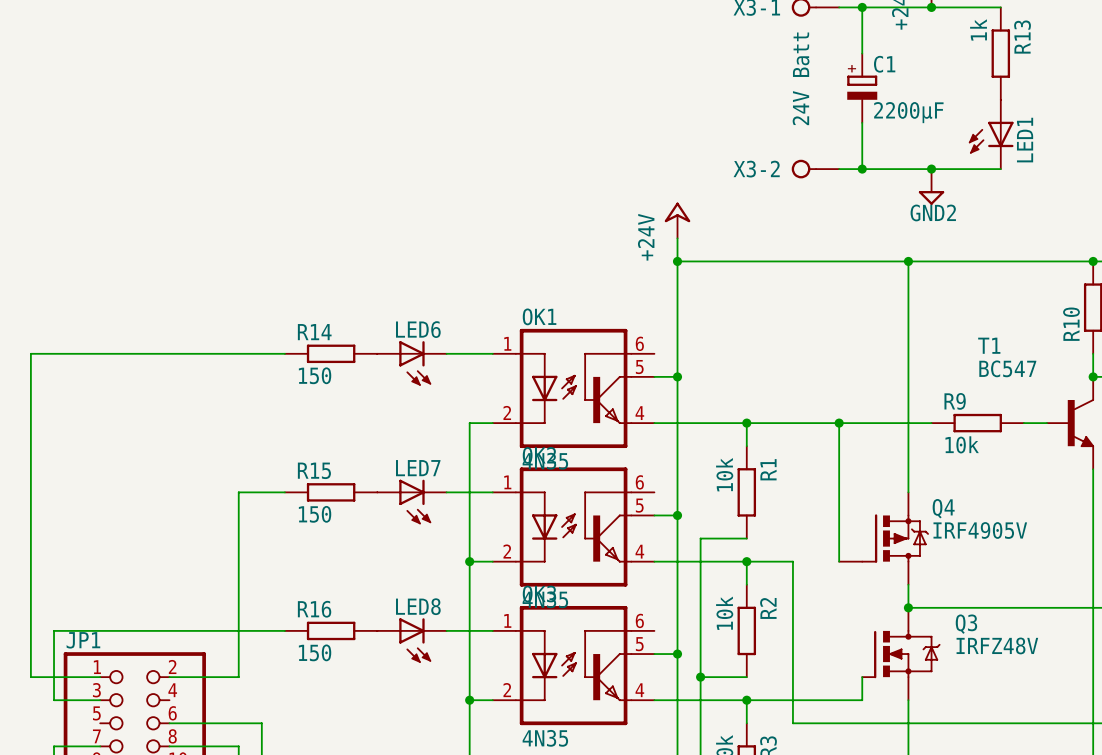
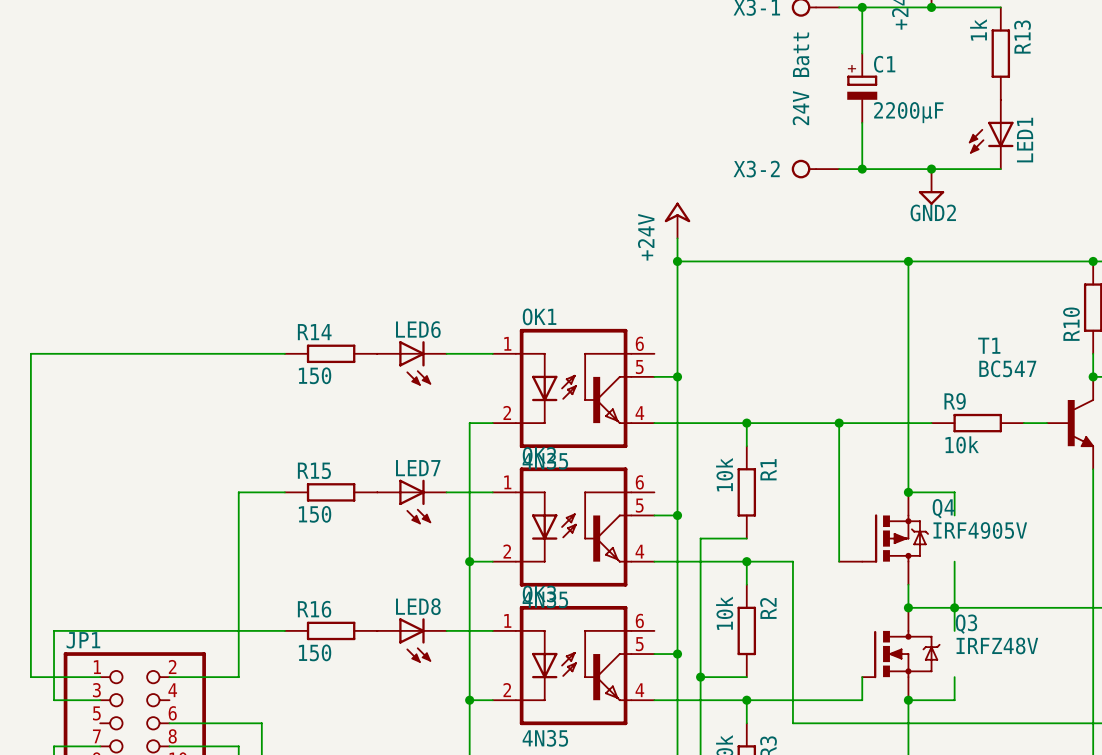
wire: none -> (908, 492) (954, 492) (954, 515)
junction: none -> (908, 492)
wire: none -> (954, 561) (954, 630)
junction: none -> (954, 607)
wire: none -> (954, 677) (954, 700) (908, 700)
junction: none -> (908, 700)

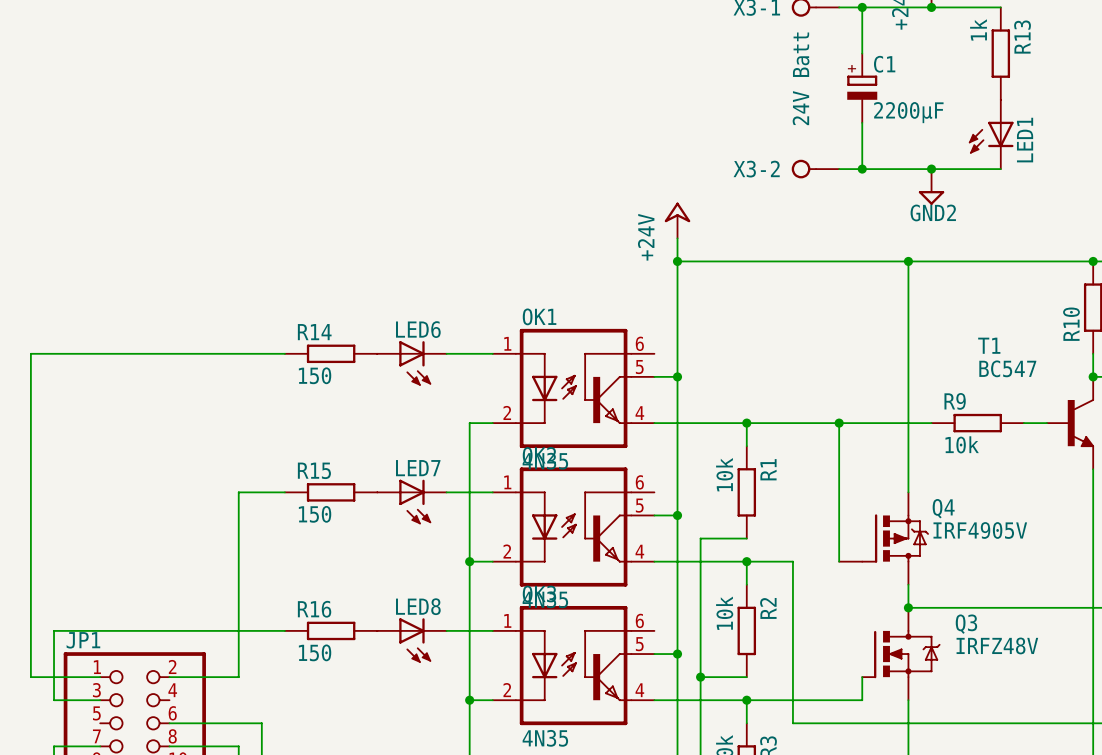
wire: (908, 492) (954, 492) (954, 515) -> none
junction: (908, 492) -> none
wire: (954, 561) (954, 630) -> none
junction: (954, 607) -> none
wire: (954, 677) (954, 700) (908, 700) -> none
junction: (908, 700) -> none

